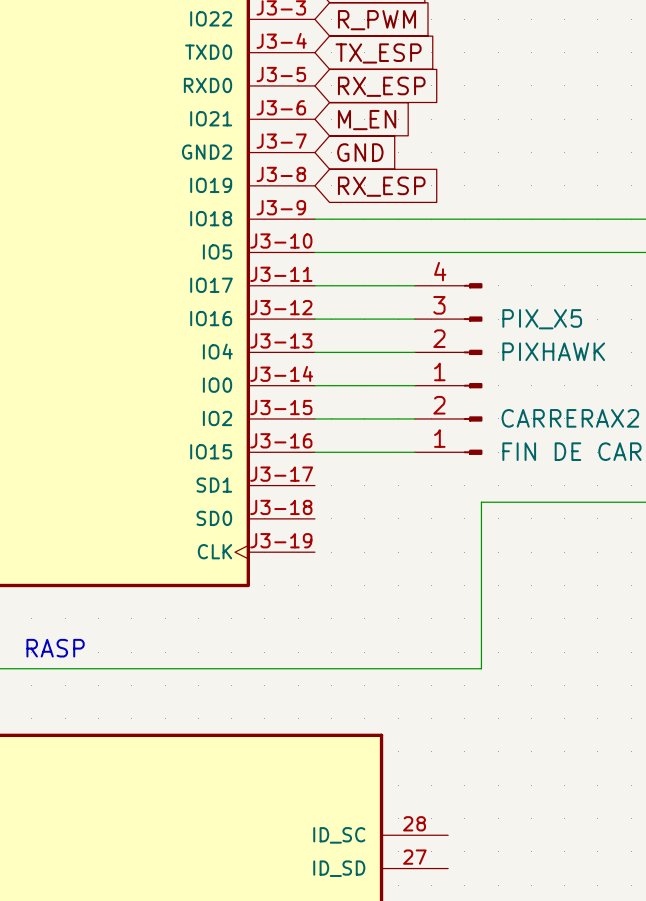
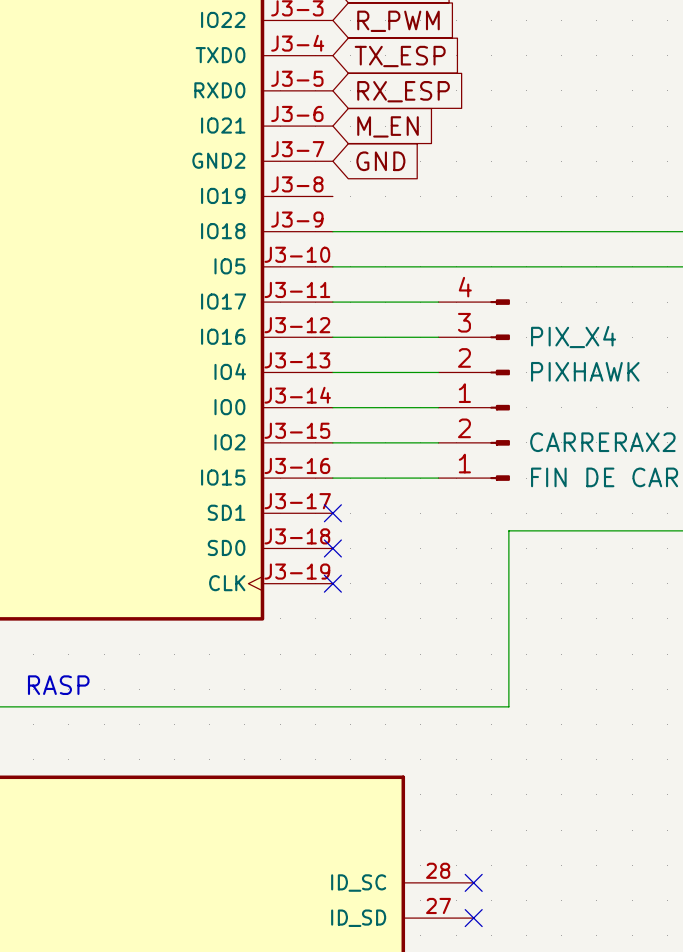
global label: RX_ESP (381, 186) -> none
PIX_X5 name: PIX_X5 (542, 319) -> PIX_X4 (573, 337)
no-connect mark: none -> (332, 513)
no-connect mark: none -> (332, 548)
no-connect mark: none -> (332, 583)
no-connect mark: none -> (473, 882)
no-connect mark: none -> (473, 918)

